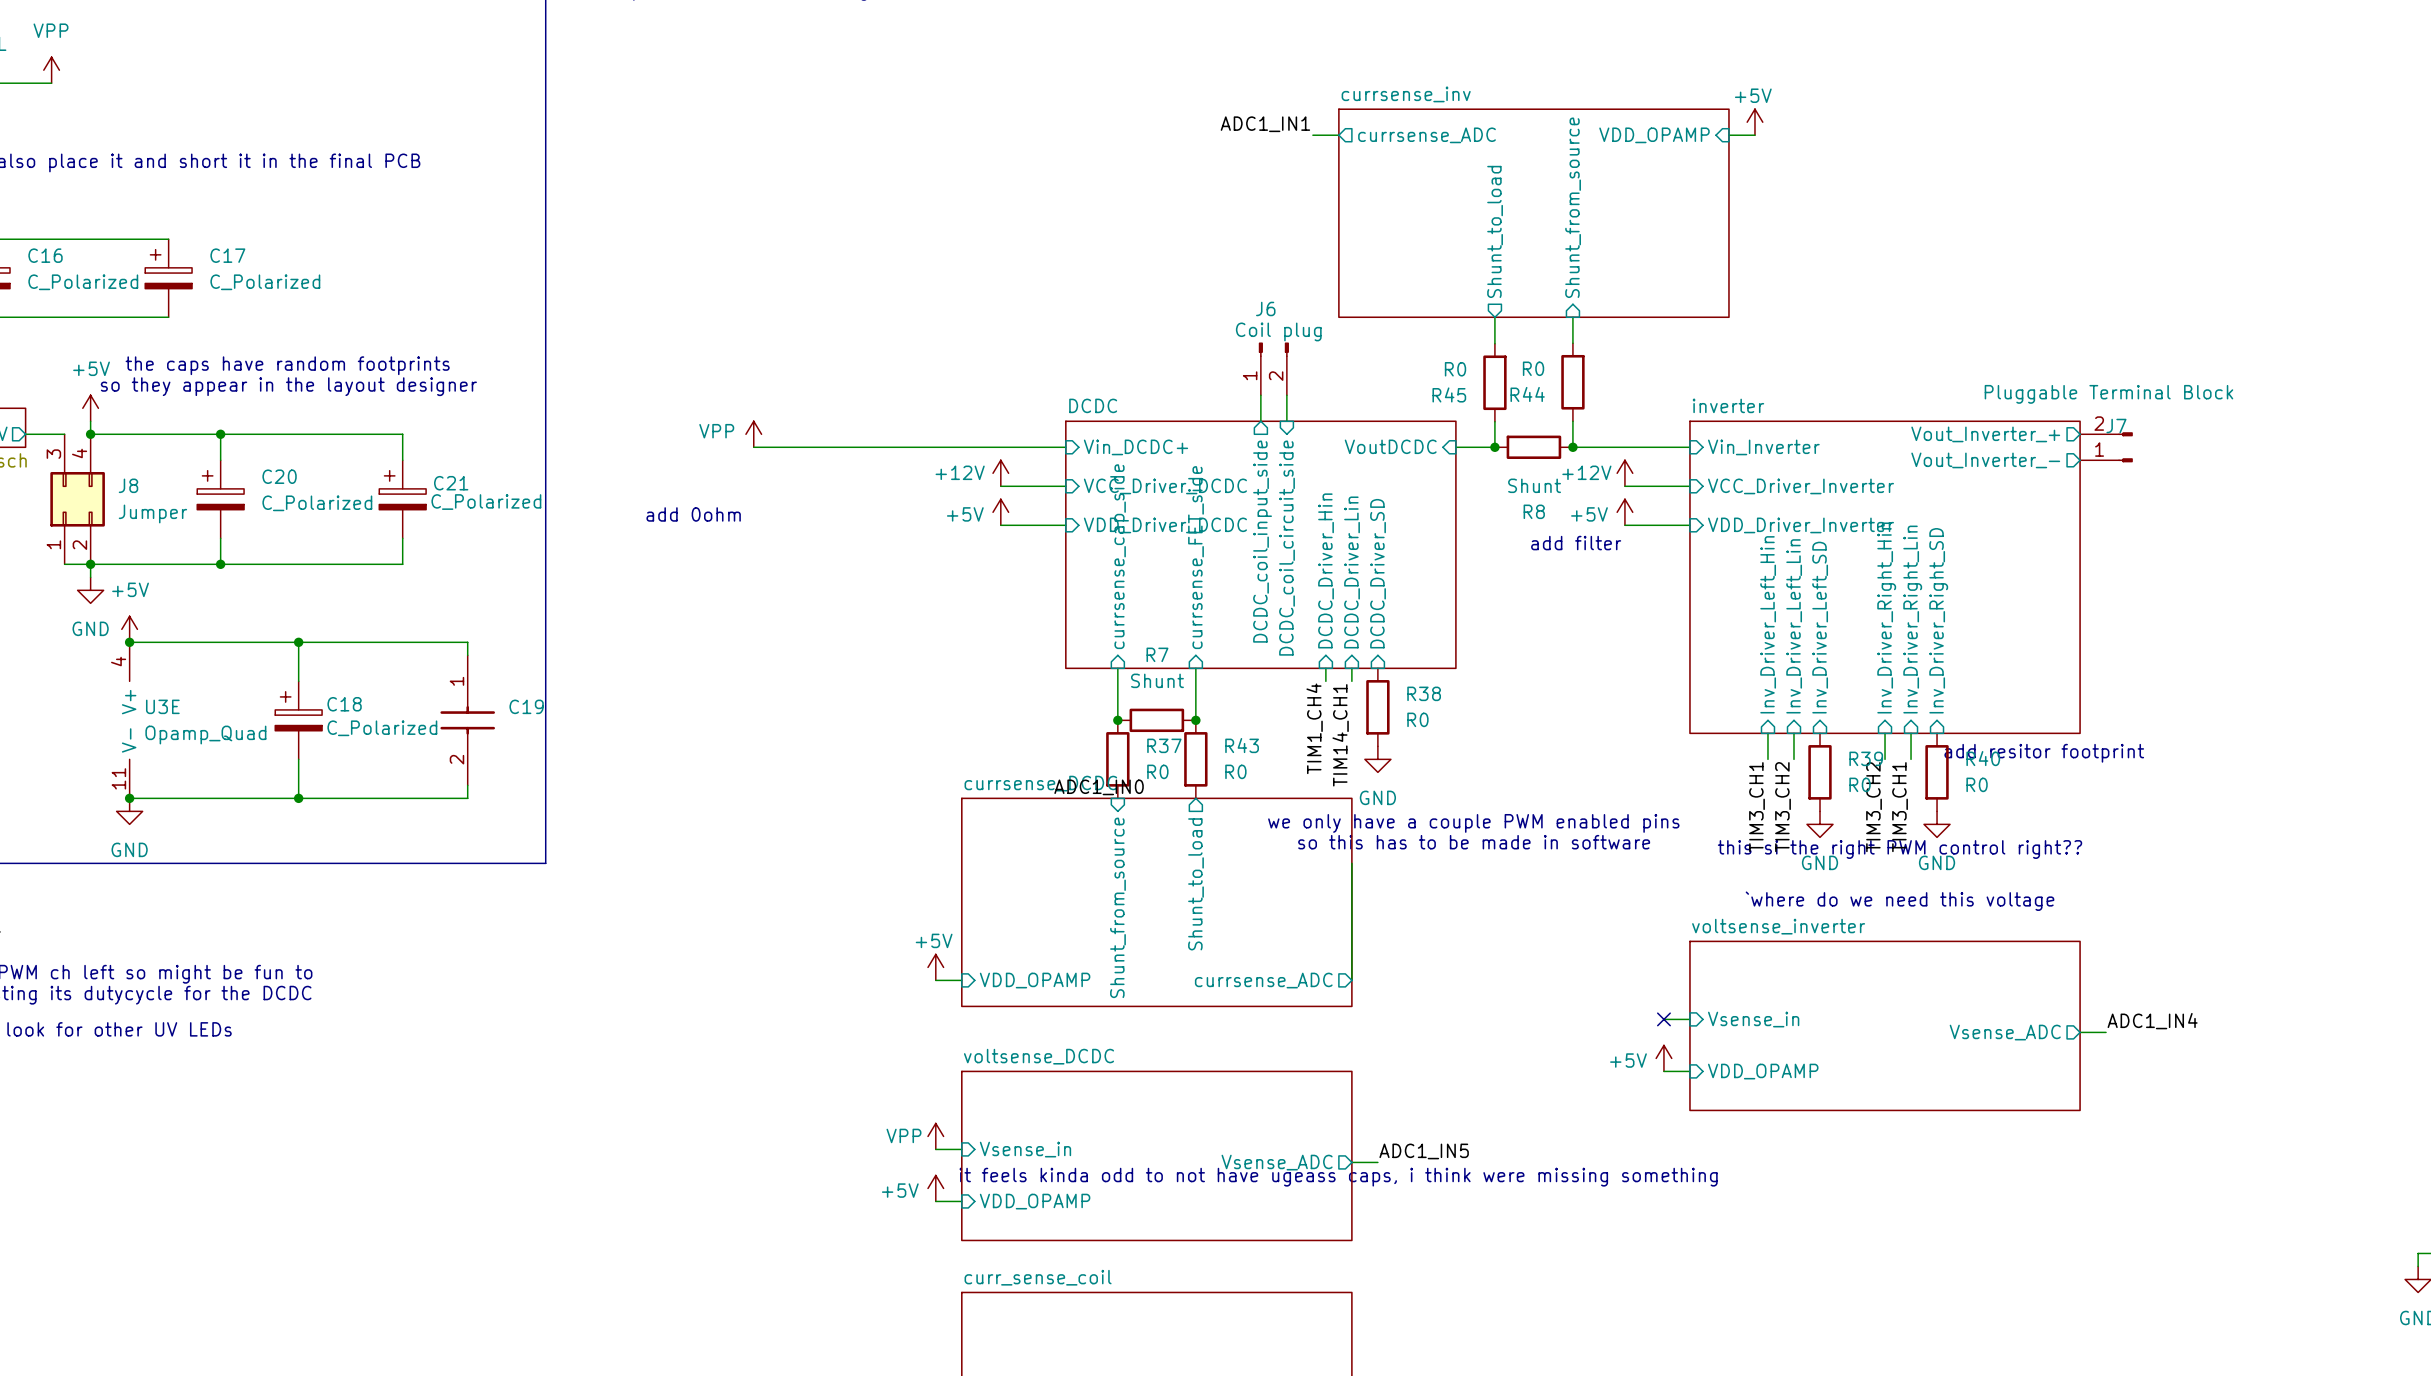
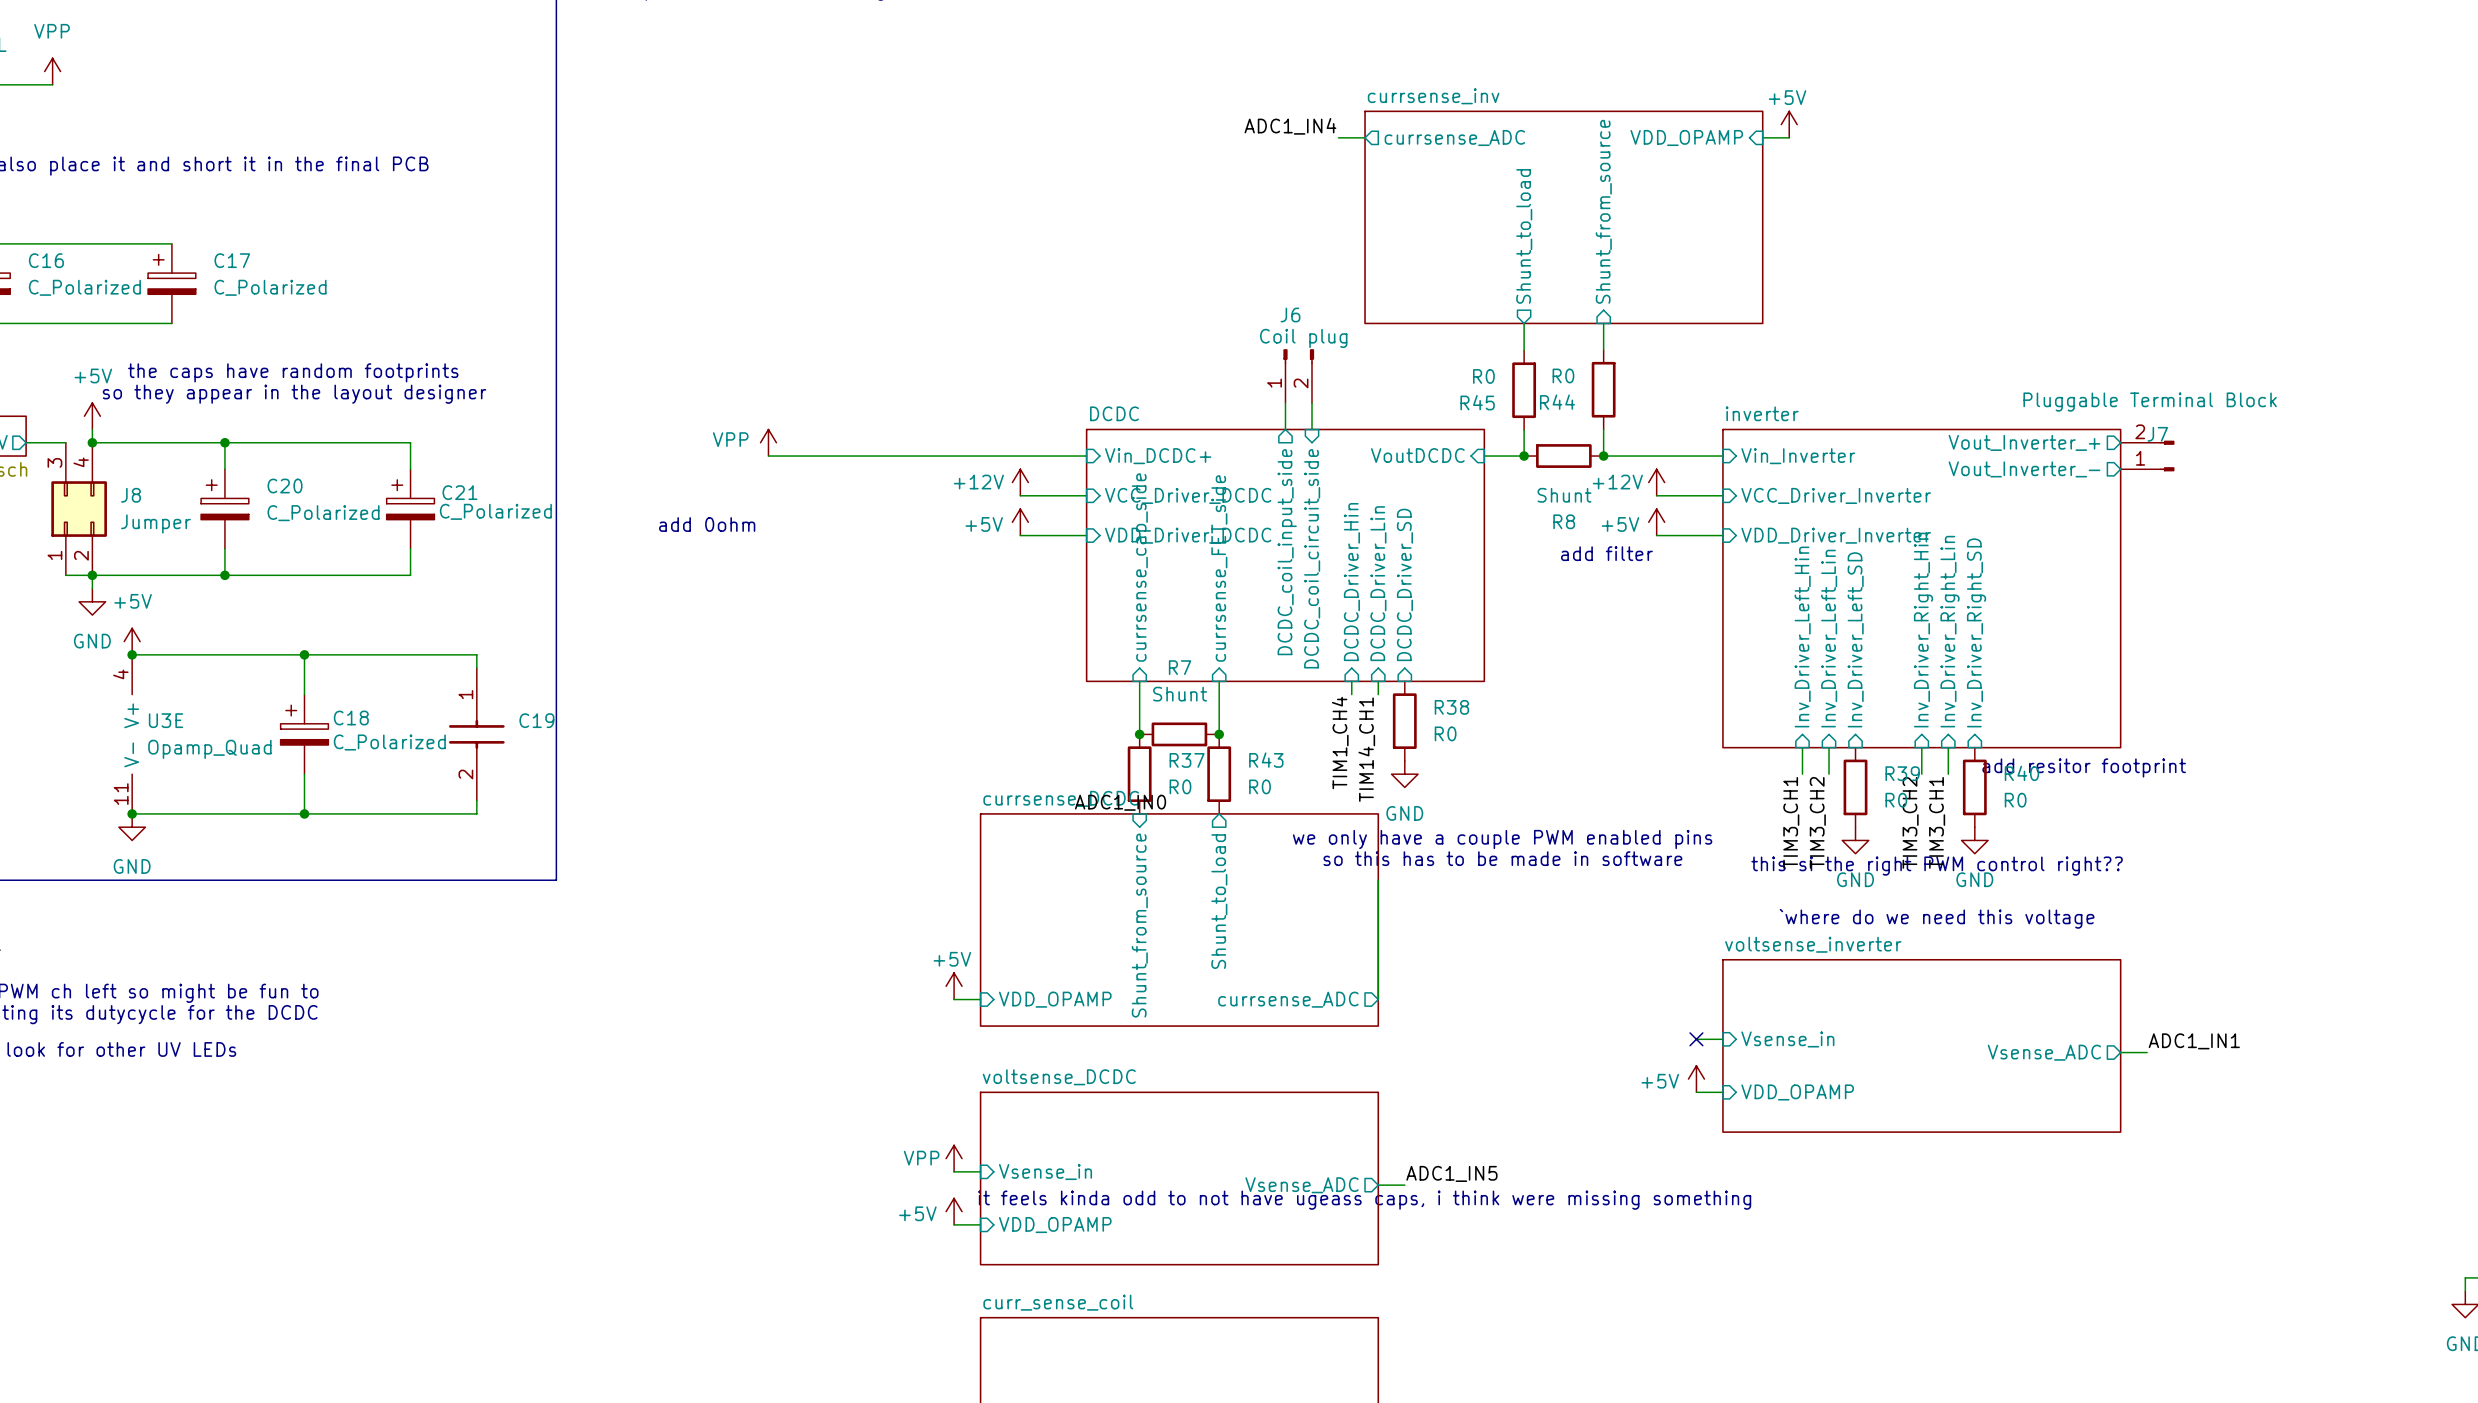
label: ADC1_IN1 (1265, 124) -> ADC1_IN4 (1290, 126)
label: ADC1_IN4 (2152, 1021) -> ADC1_IN1 (2194, 1041)

